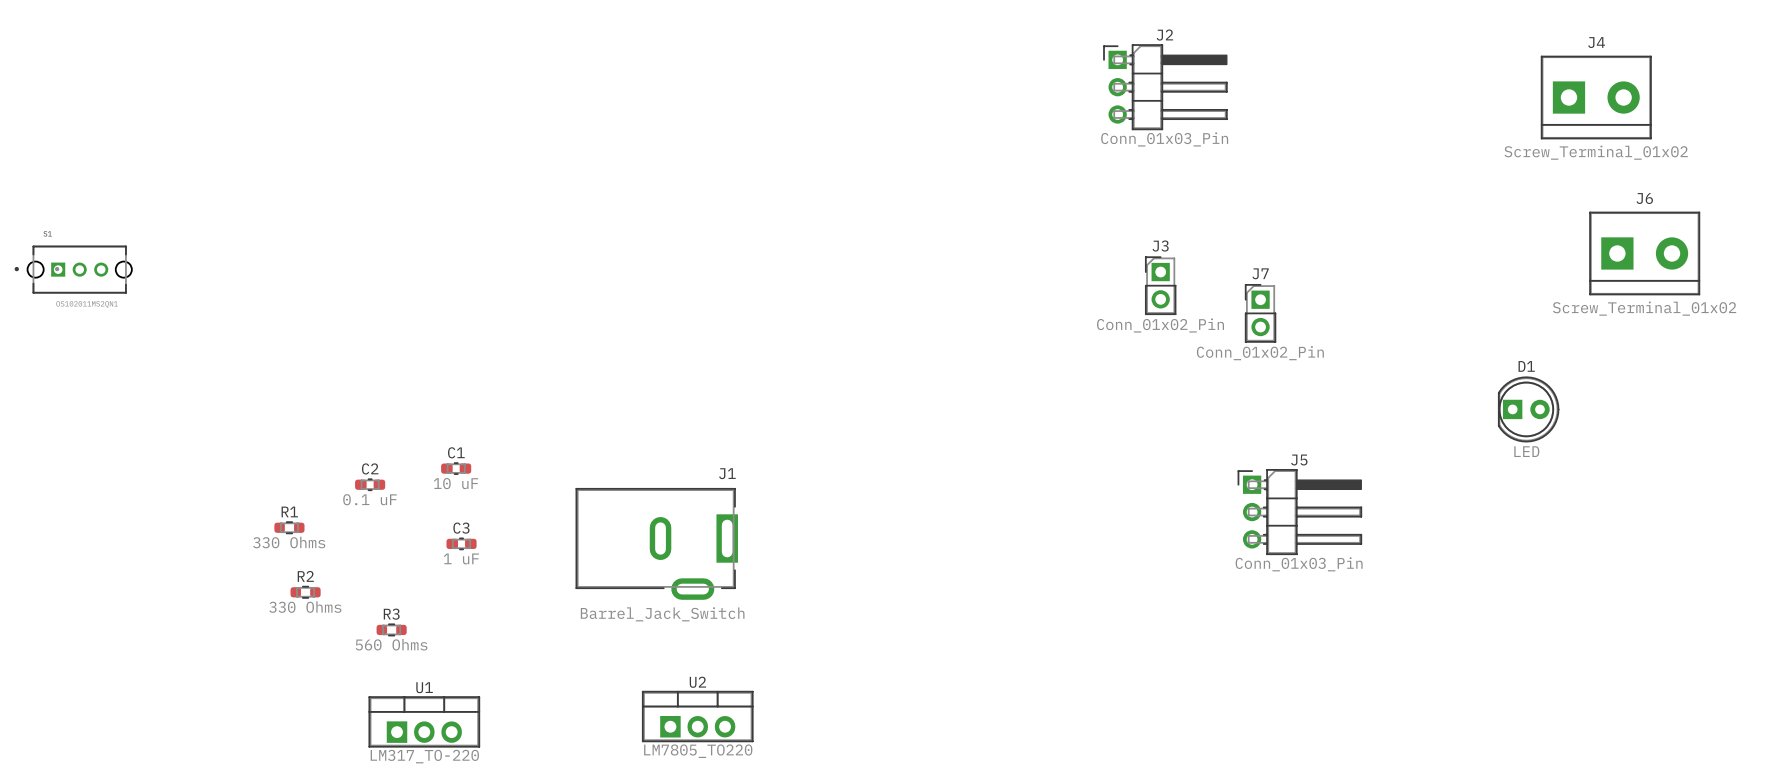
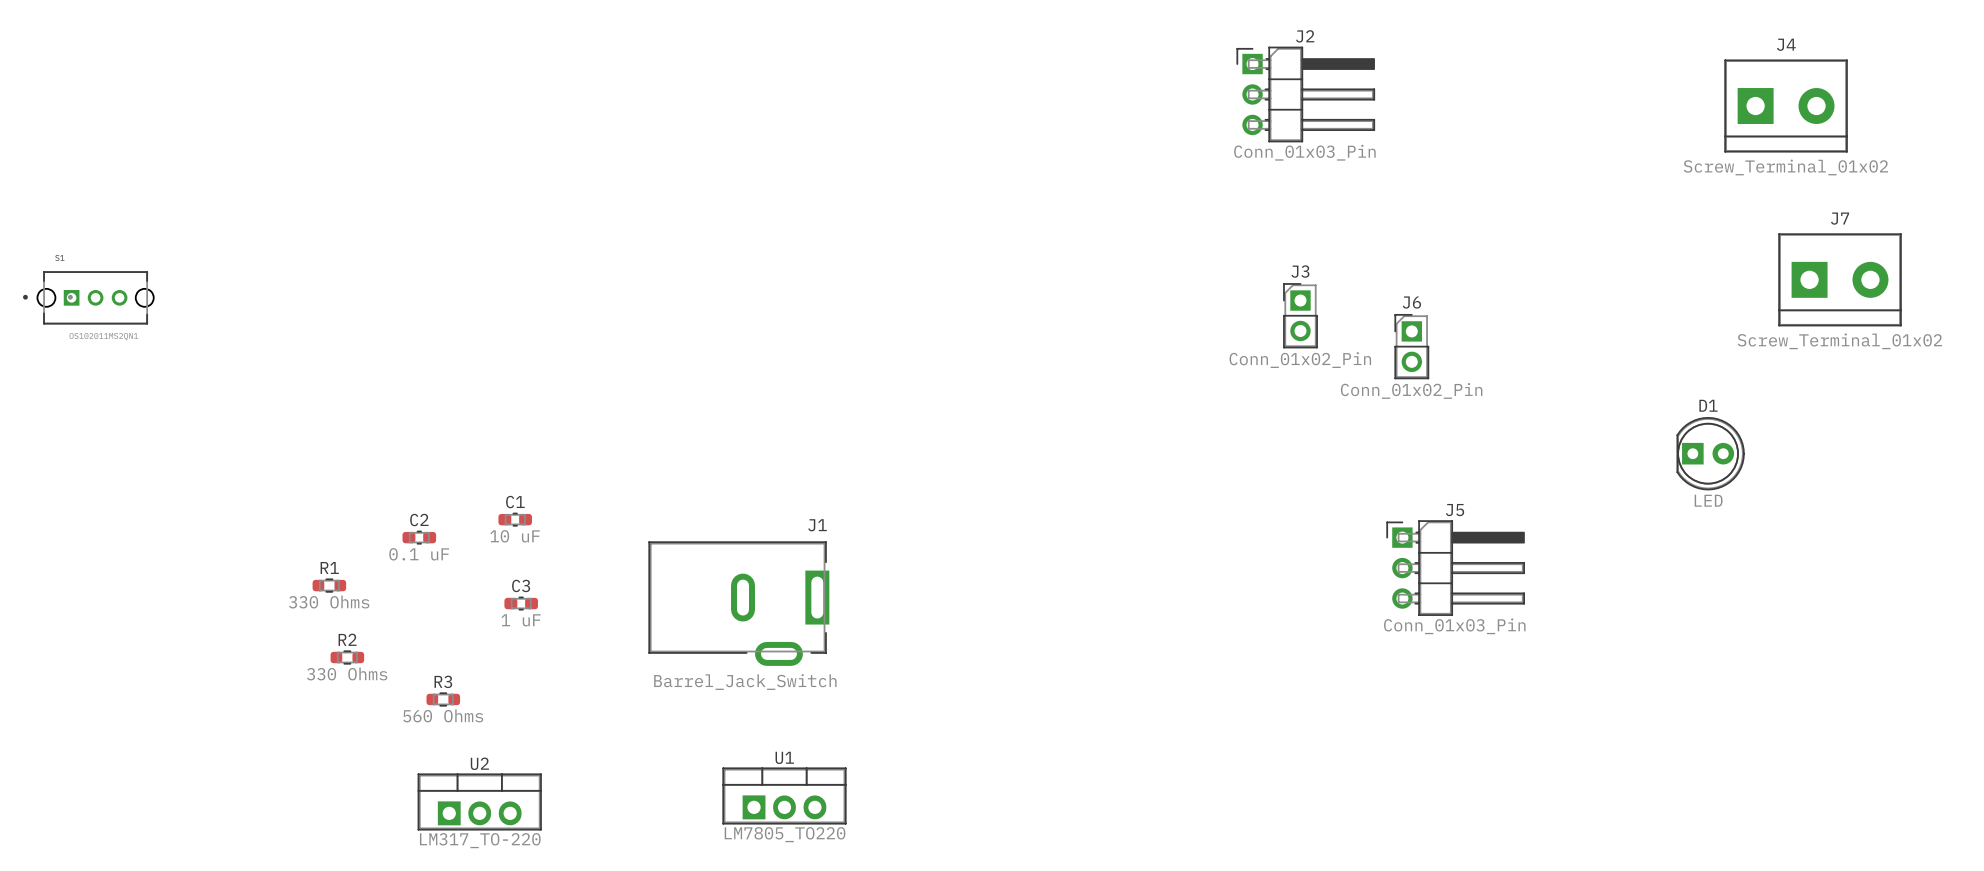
J6 name: J6 (1644, 198) -> J7 (1840, 218)
J7 name: J7 (1260, 273) -> J6 (1411, 302)
U2 name: U2 (697, 682) -> U1 (784, 757)
U1 name: U1 (424, 687) -> U2 (479, 763)

